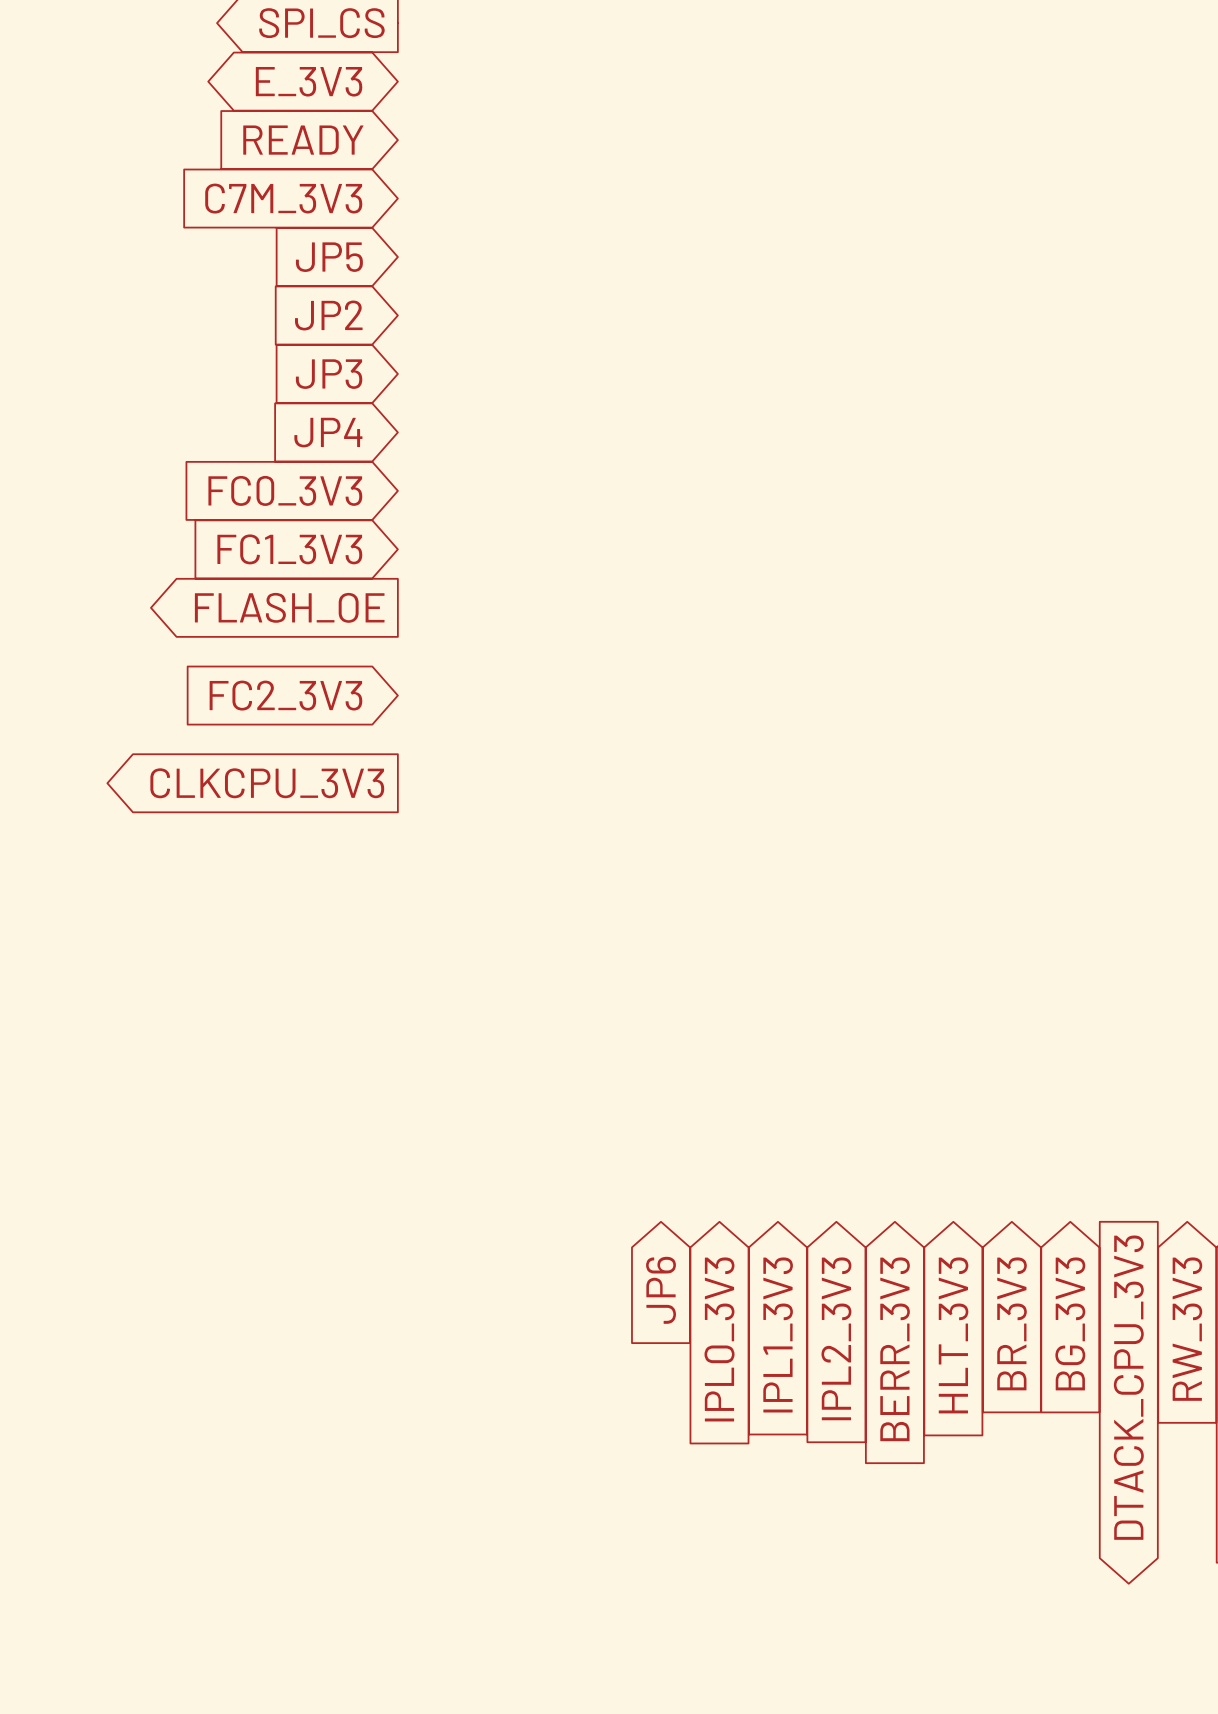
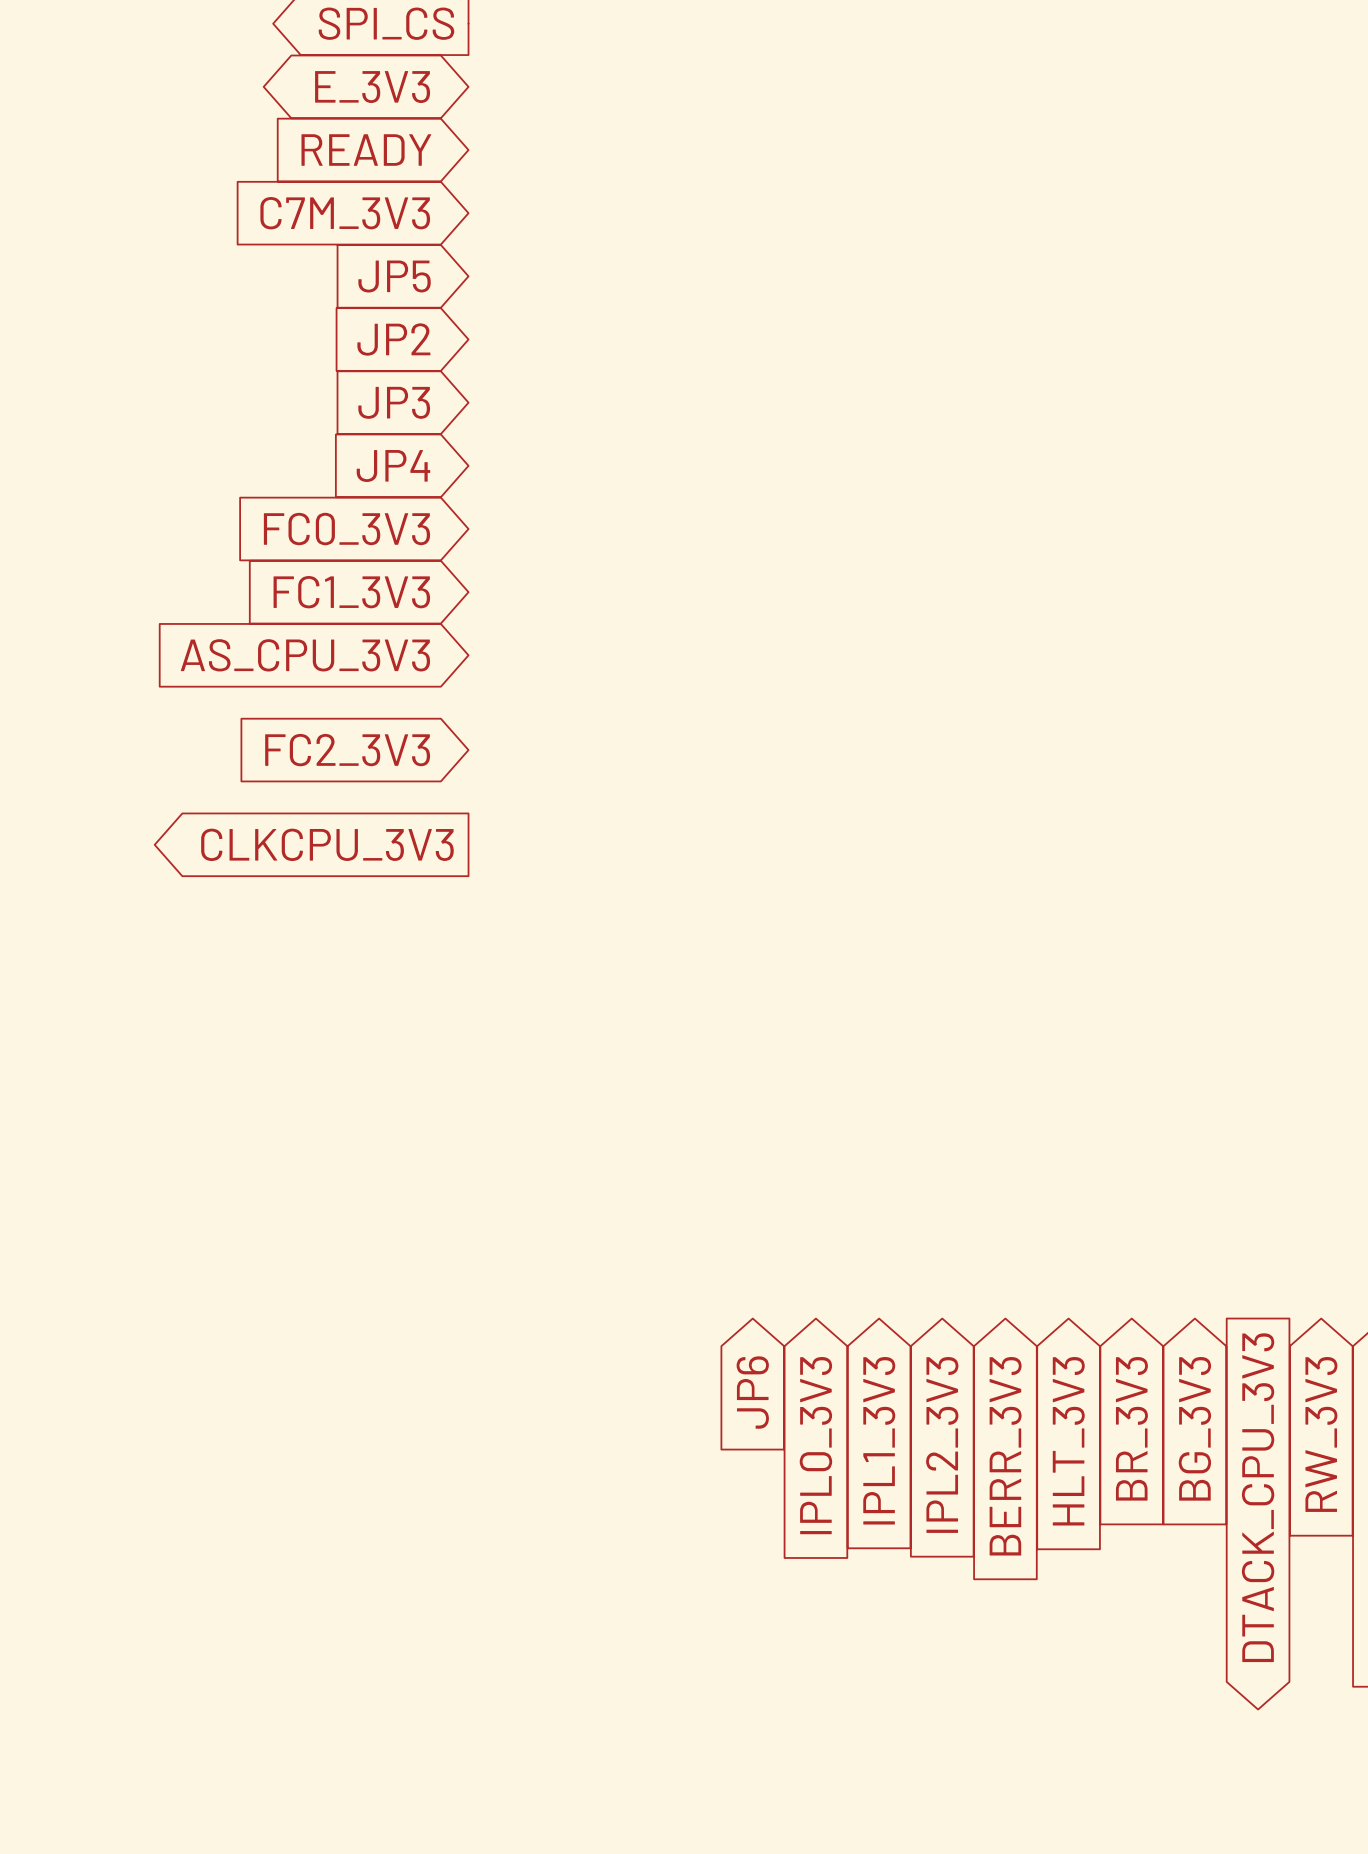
global label shape: output (289, 607) -> input (305, 655)
global label: FLASH_OE (289, 607) -> AS_CPU_3V3 (305, 655)

